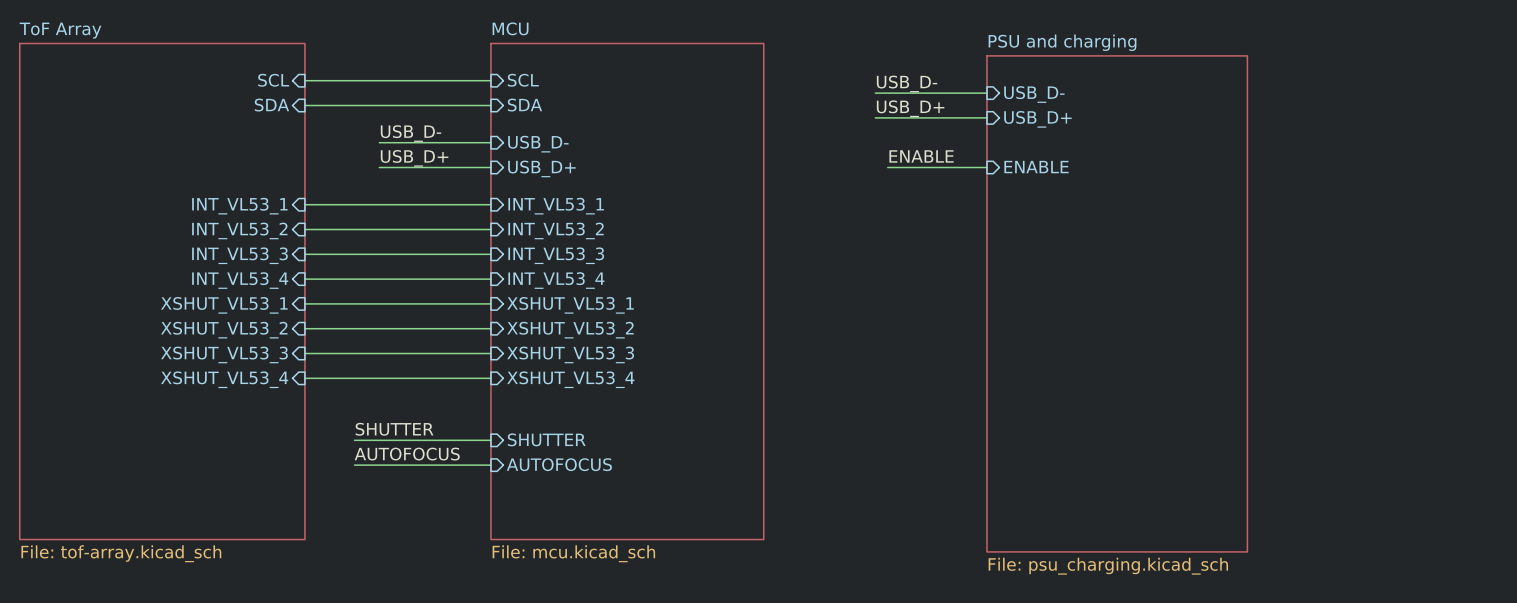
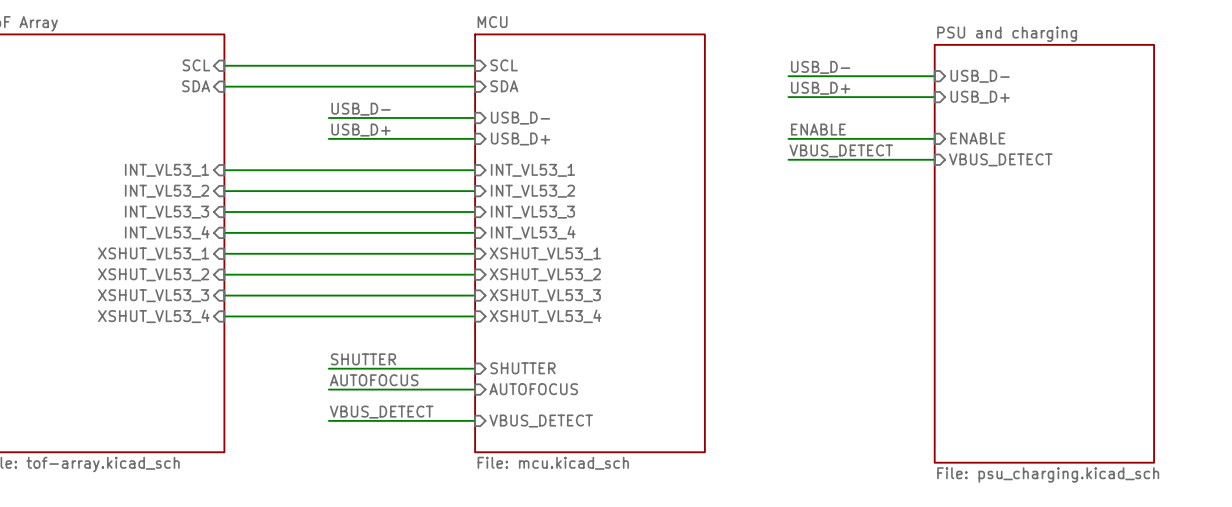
wire: none -> (381, 65) (475, 65)
sheet pin position: SCL (523, 80) -> SCL (504, 65)
label position: USB_D- (907, 83) -> USB_D- (820, 67)
wire: (875, 93) (974, 93) -> none
wire: none -> (798, 76) (934, 76)
sheet pin position: USB_D- (1034, 94) -> USB_D- (980, 76)
wire: none -> (381, 86) (475, 86)
sheet pin position: SDA (524, 105) -> SDA (504, 86)
label position: USB_D+ (910, 108) -> USB_D+ (820, 88)
wire: (875, 117) (974, 117) -> none
wire: none -> (798, 97) (934, 97)
sheet pin position: USB_D+ (1037, 119) -> USB_D+ (980, 97)
label position: USB_D- (411, 133) -> USB_D- (361, 109)
wire: (379, 142) (428, 142) -> none
wire: none -> (381, 117) (475, 117)
sheet pin position: USB_D- (538, 144) -> USB_D- (520, 118)
label position: ENABLE (921, 156) -> ENABLE (818, 129)
label position: USB_D+ (414, 158) -> USB_D+ (361, 130)
wire: (379, 167) (428, 167) -> none
wire: none -> (381, 138) (475, 138)
wire: (887, 167) (974, 167) -> none
wire: none -> (798, 138) (934, 138)
sheet pin position: ENABLE (1036, 167) -> ENABLE (977, 138)
sheet pin position: USB_D+ (541, 168) -> USB_D+ (520, 138)
label: none -> VBUS_DETECT (841, 150)
wire: none -> (788, 159) (934, 159)
sheet pin: none -> VBUS_DETECT (1000, 159)
wire: none -> (381, 170) (475, 170)
sheet pin position: INT_VL53_1 (556, 206) -> INT_VL53_1 (532, 170)
wire: none -> (381, 191) (475, 191)
sheet pin position: INT_VL53_2 (556, 230) -> INT_VL53_2 (532, 191)
wire: none -> (381, 212) (475, 212)
sheet pin position: INT_VL53_3 (556, 255) -> INT_VL53_3 (532, 212)
wire: none -> (381, 232) (475, 232)
sheet pin position: INT_VL53_4 (556, 280) -> INT_VL53_4 (533, 232)
sheet MCU position: (627, 291) -> (589, 243)
wire: none -> (381, 253) (475, 253)
sheet PSU and charging position: (1117, 303) -> (1044, 253)
sheet pin position: XSHUT_VL53_1 (570, 305) -> XSHUT_VL53_1 (545, 253)
wire: none -> (381, 274) (475, 274)
sheet pin position: XSHUT_VL53_2 (570, 330) -> XSHUT_VL53_2 (545, 274)
wire: none -> (381, 295) (475, 295)
sheet pin position: XSHUT_VL53_3 (570, 354) -> XSHUT_VL53_3 (545, 295)
wire: none -> (381, 316) (475, 316)
sheet pin position: XSHUT_VL53_4 (570, 379) -> XSHUT_VL53_4 (545, 316)
label position: SHUTTER (394, 429) -> SHUTTER (363, 359)
sheet pin position: SHUTTER (546, 439) -> SHUTTER (523, 368)
wire: (354, 440) (428, 440) -> none
wire: none -> (381, 368) (475, 368)
label position: AUTOFOCUS (407, 454) -> AUTOFOCUS (374, 380)
sheet pin position: AUTOFOCUS (559, 464) -> AUTOFOCUS (533, 389)
wire: (354, 465) (428, 465) -> none
wire: none -> (381, 389) (475, 389)
label: none -> VBUS_DETECT (381, 412)
wire: none -> (328, 420) (475, 420)
sheet pin: none -> VBUS_DETECT (541, 421)

